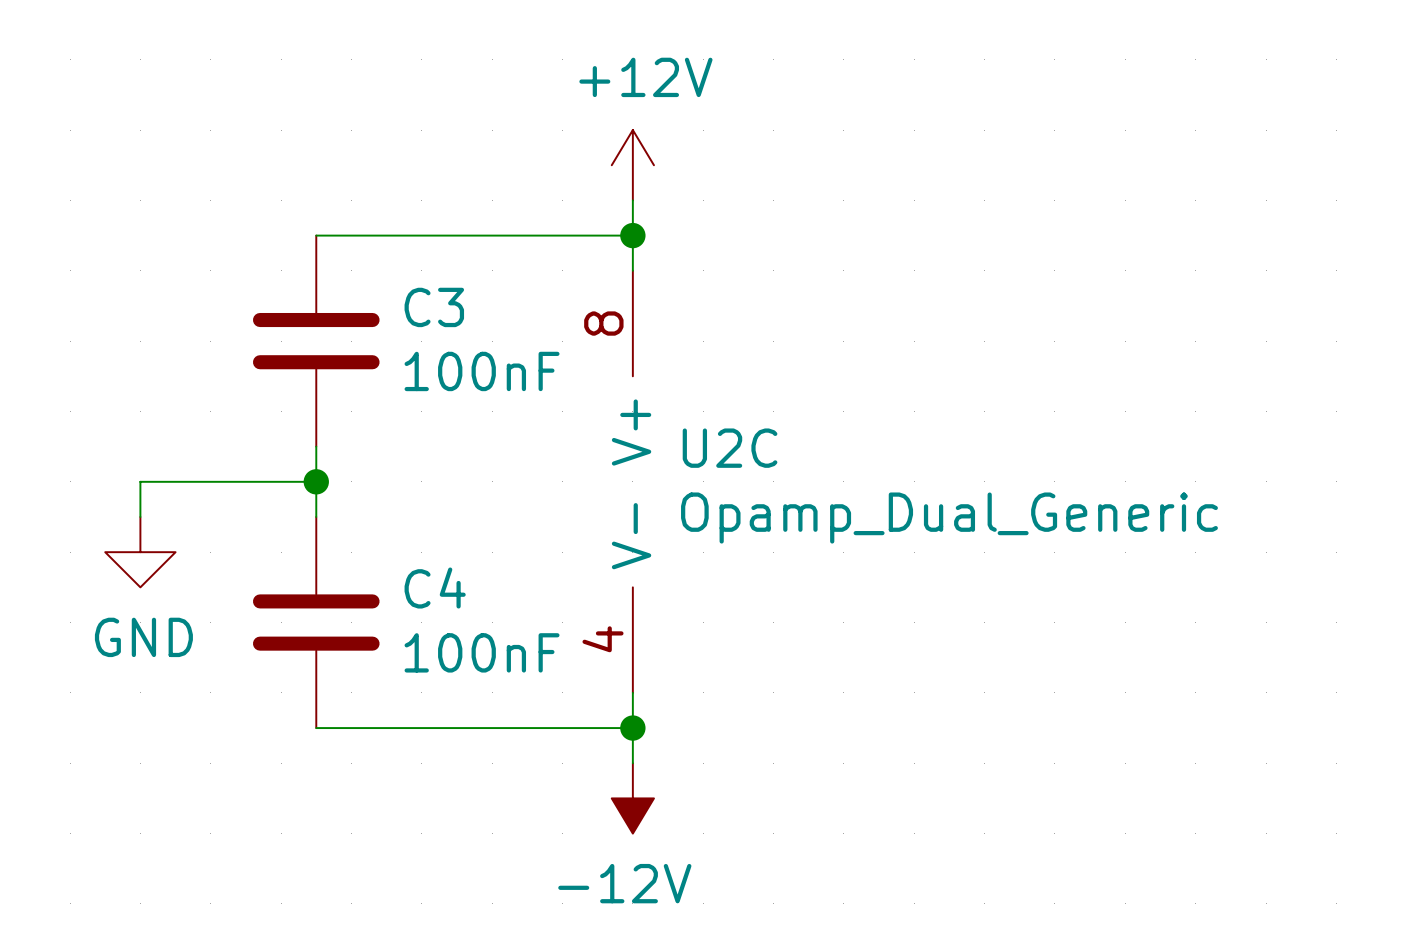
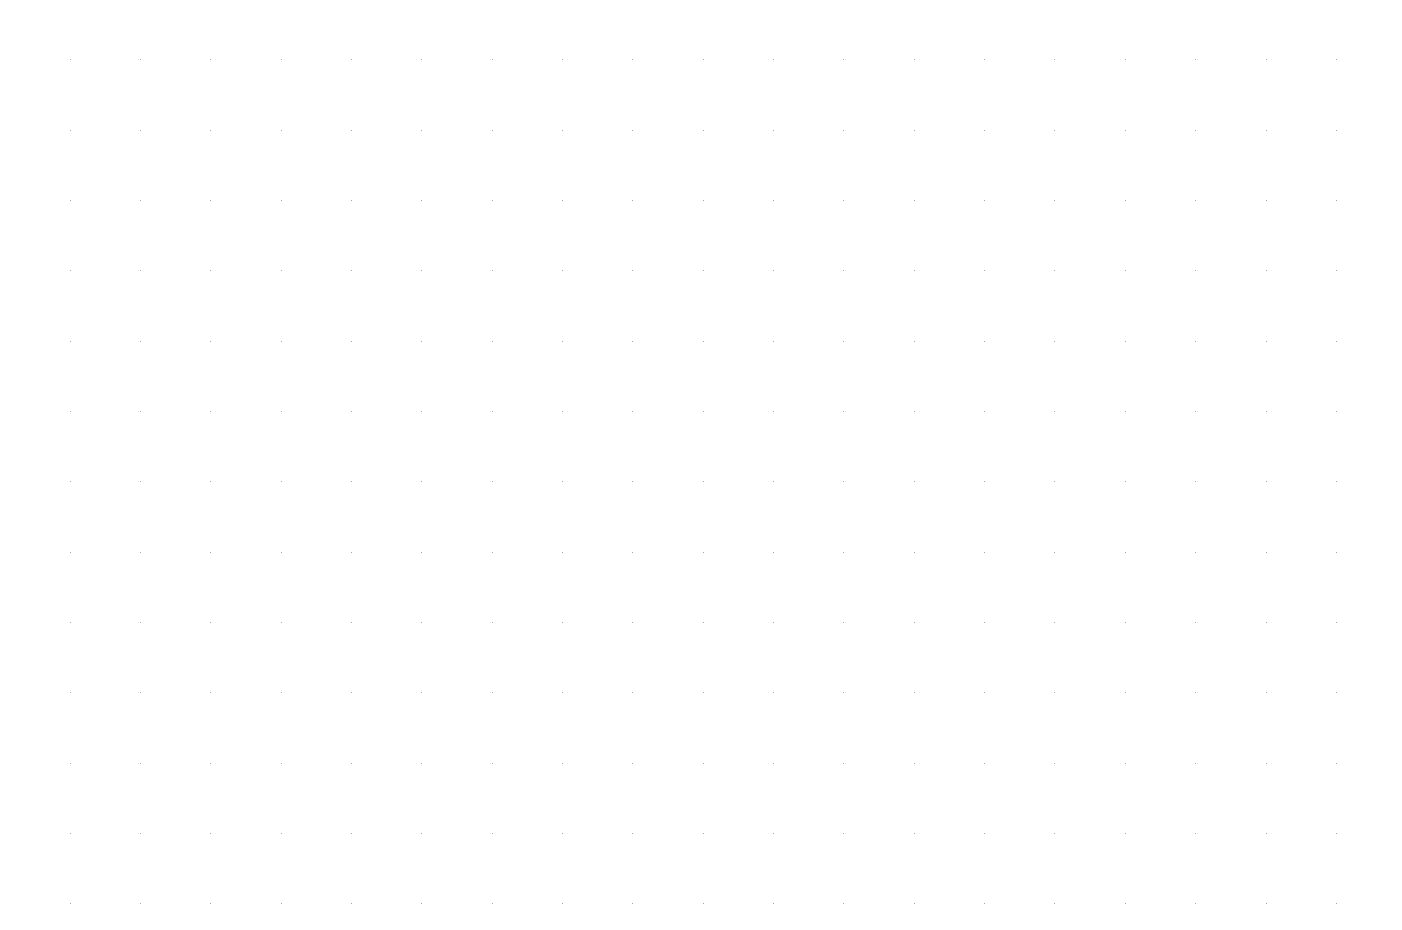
power symbol: +12V (632, 165) -> none
wire: (632, 200) (632, 270) -> none
wire: (316, 235) (632, 235) -> none
junction: (632, 235) -> none
C3: 100nF (316, 341) -> none
wire: (316, 446) (316, 517) -> none
wire: (316, 481) (140, 481) (140, 517) -> none
junction: (316, 481) -> none
U2C: Opamp_Dual_Generic (632, 481) -> none
power symbol: GND (140, 552) -> none
C4: 100nF (316, 622) -> none
wire: (632, 692) (632, 763) -> none
wire: (316, 728) (632, 728) -> none
junction: (632, 728) -> none
power symbol: -12V (632, 798) -> none

